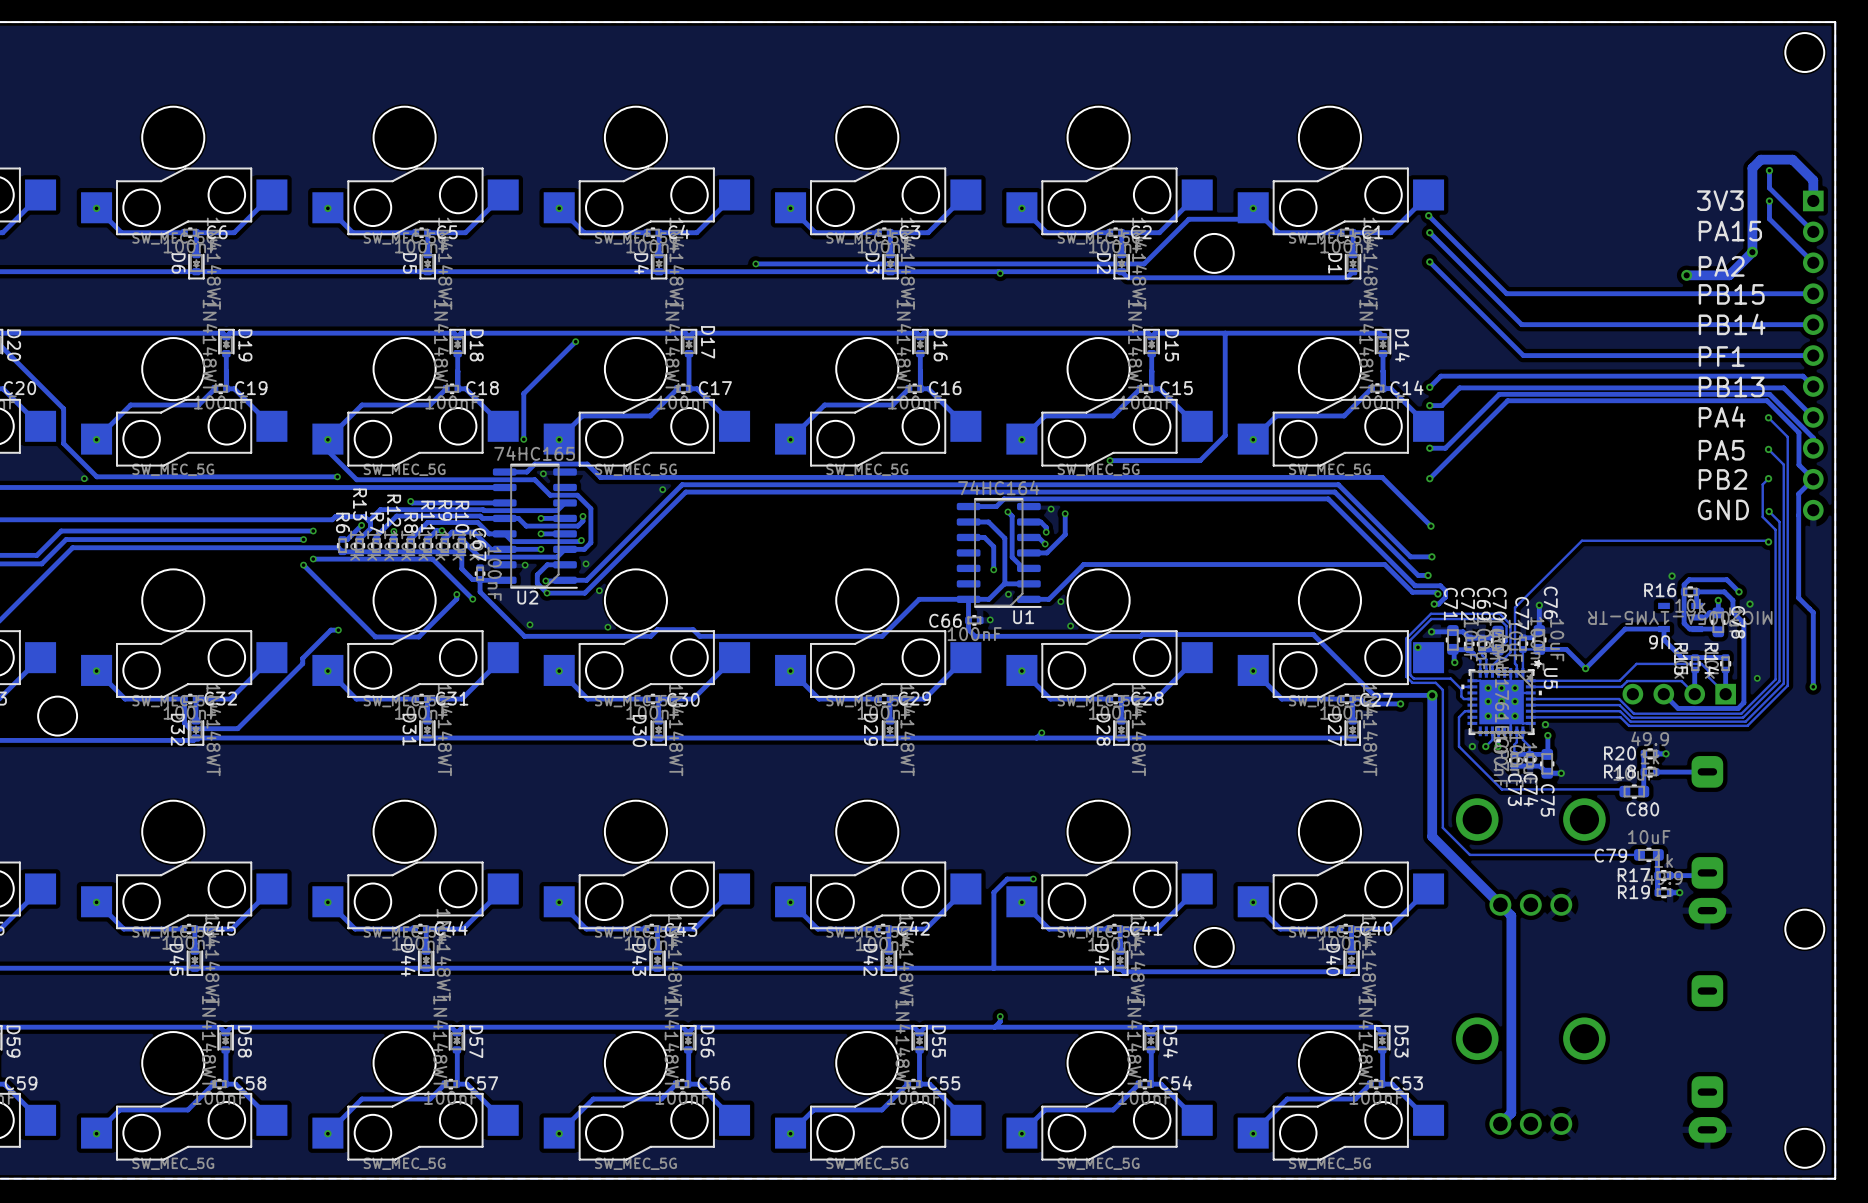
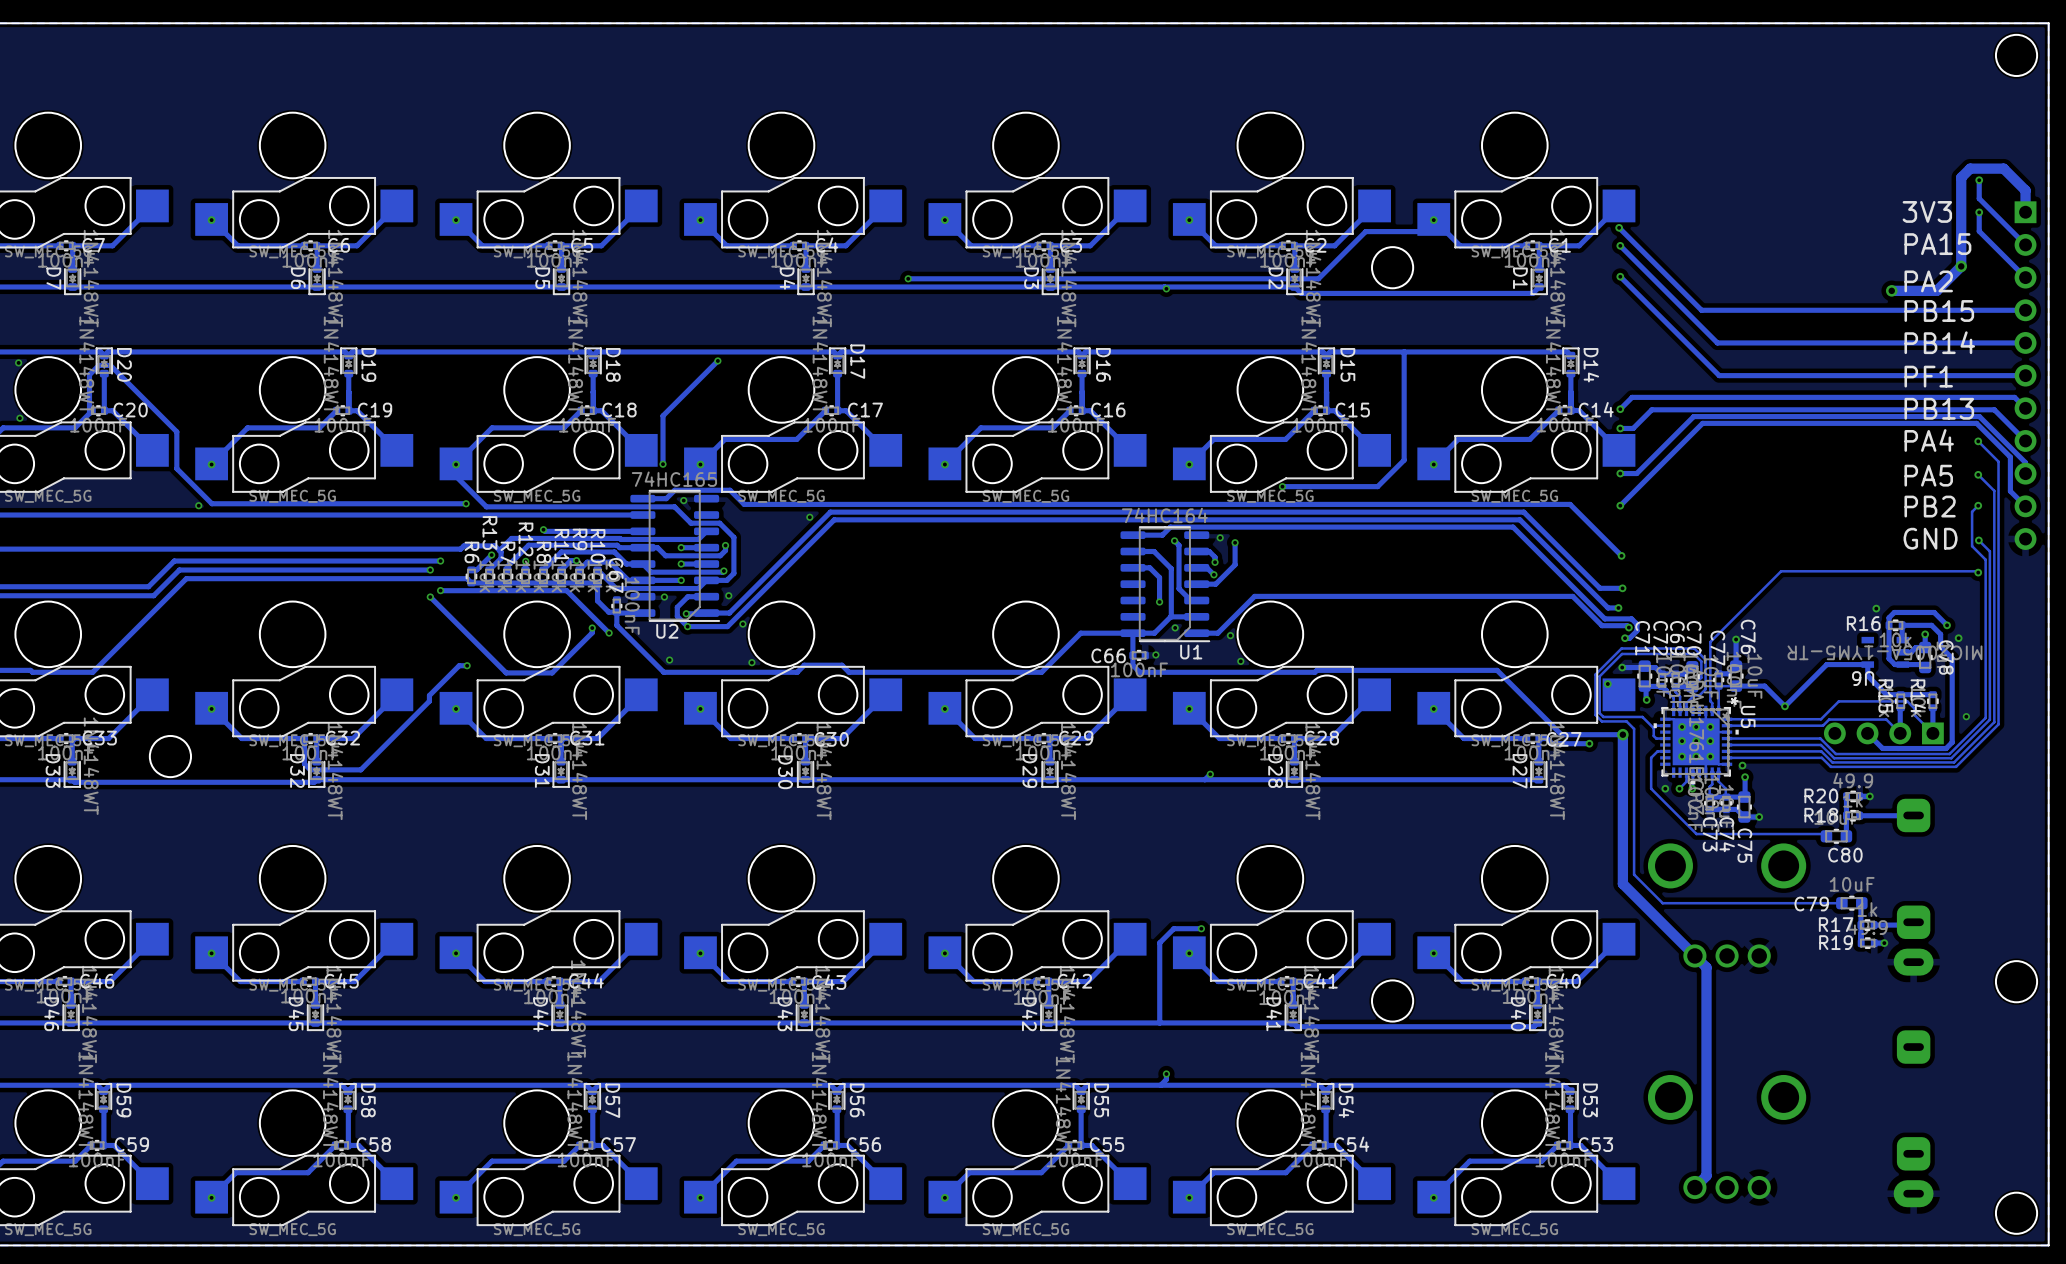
track: (1813, 479) (1798, 493) (1798, 597) (1813, 612) (1813, 686) -> none
via: (1813, 686) -> none

